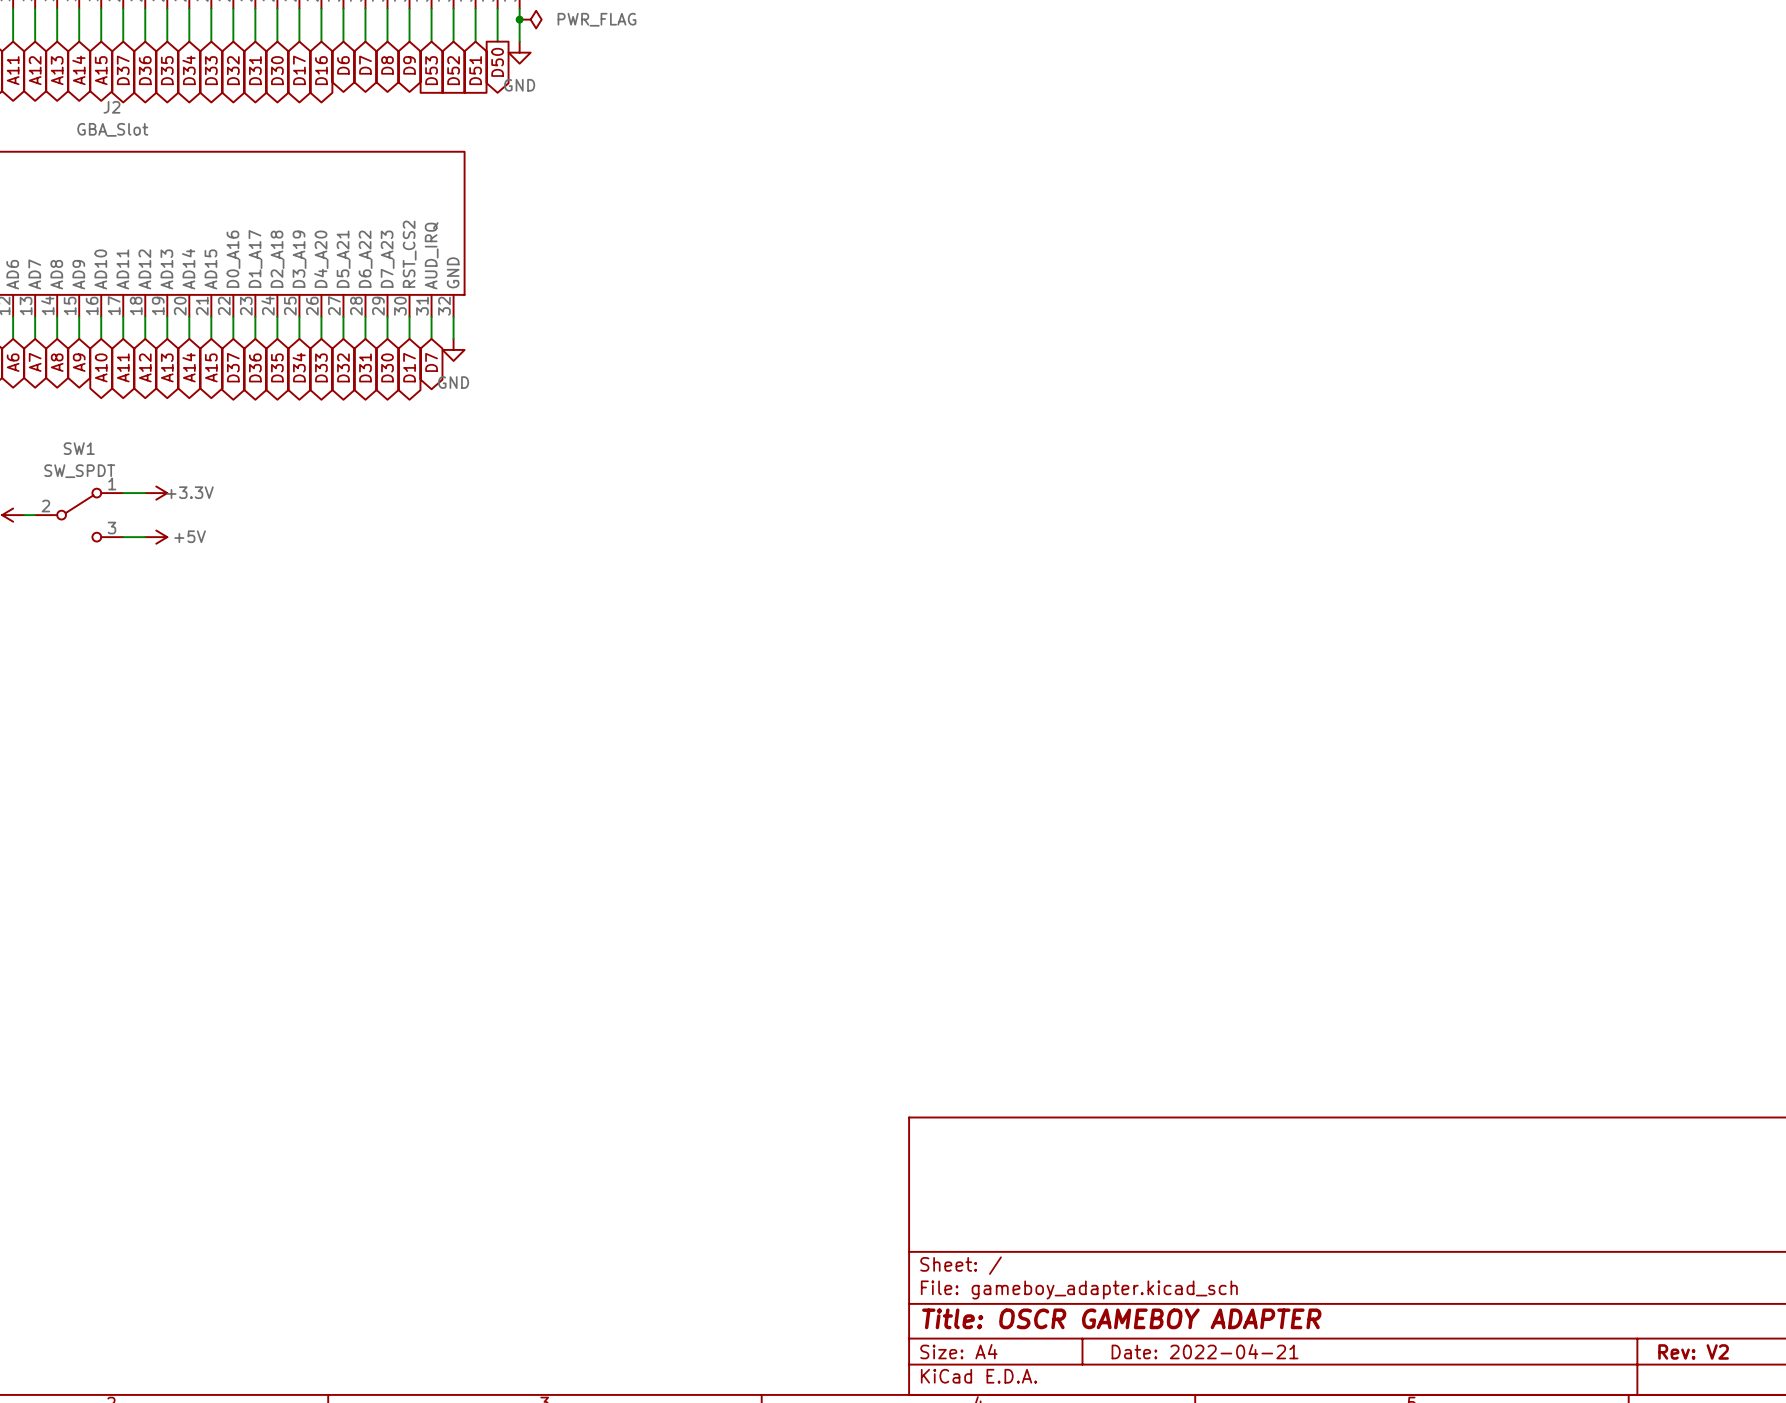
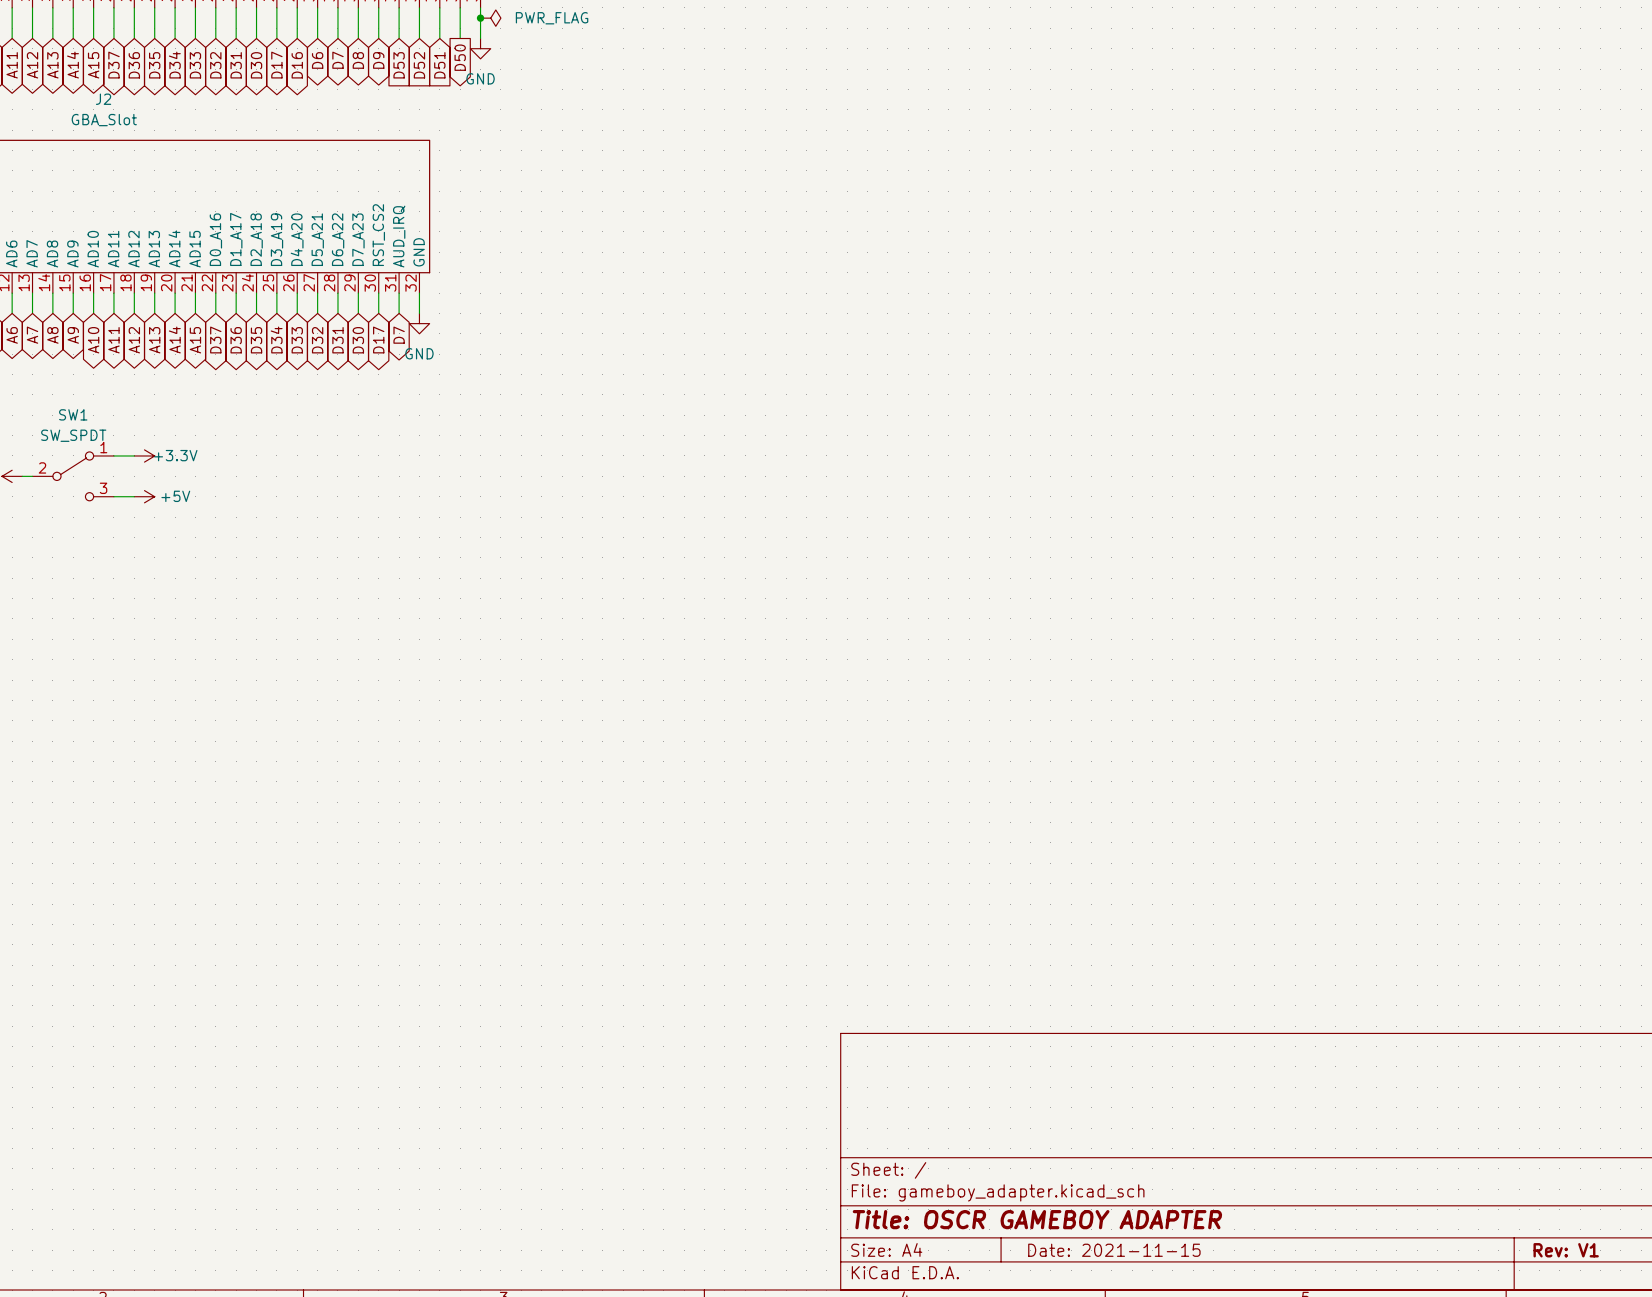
title block: Date: 2022-04-21 (1205, 1351) -> Date: 2021-11-15 (1114, 1250)
title block: Rev: V2 (1693, 1351) -> Rev: V1 (1566, 1250)

